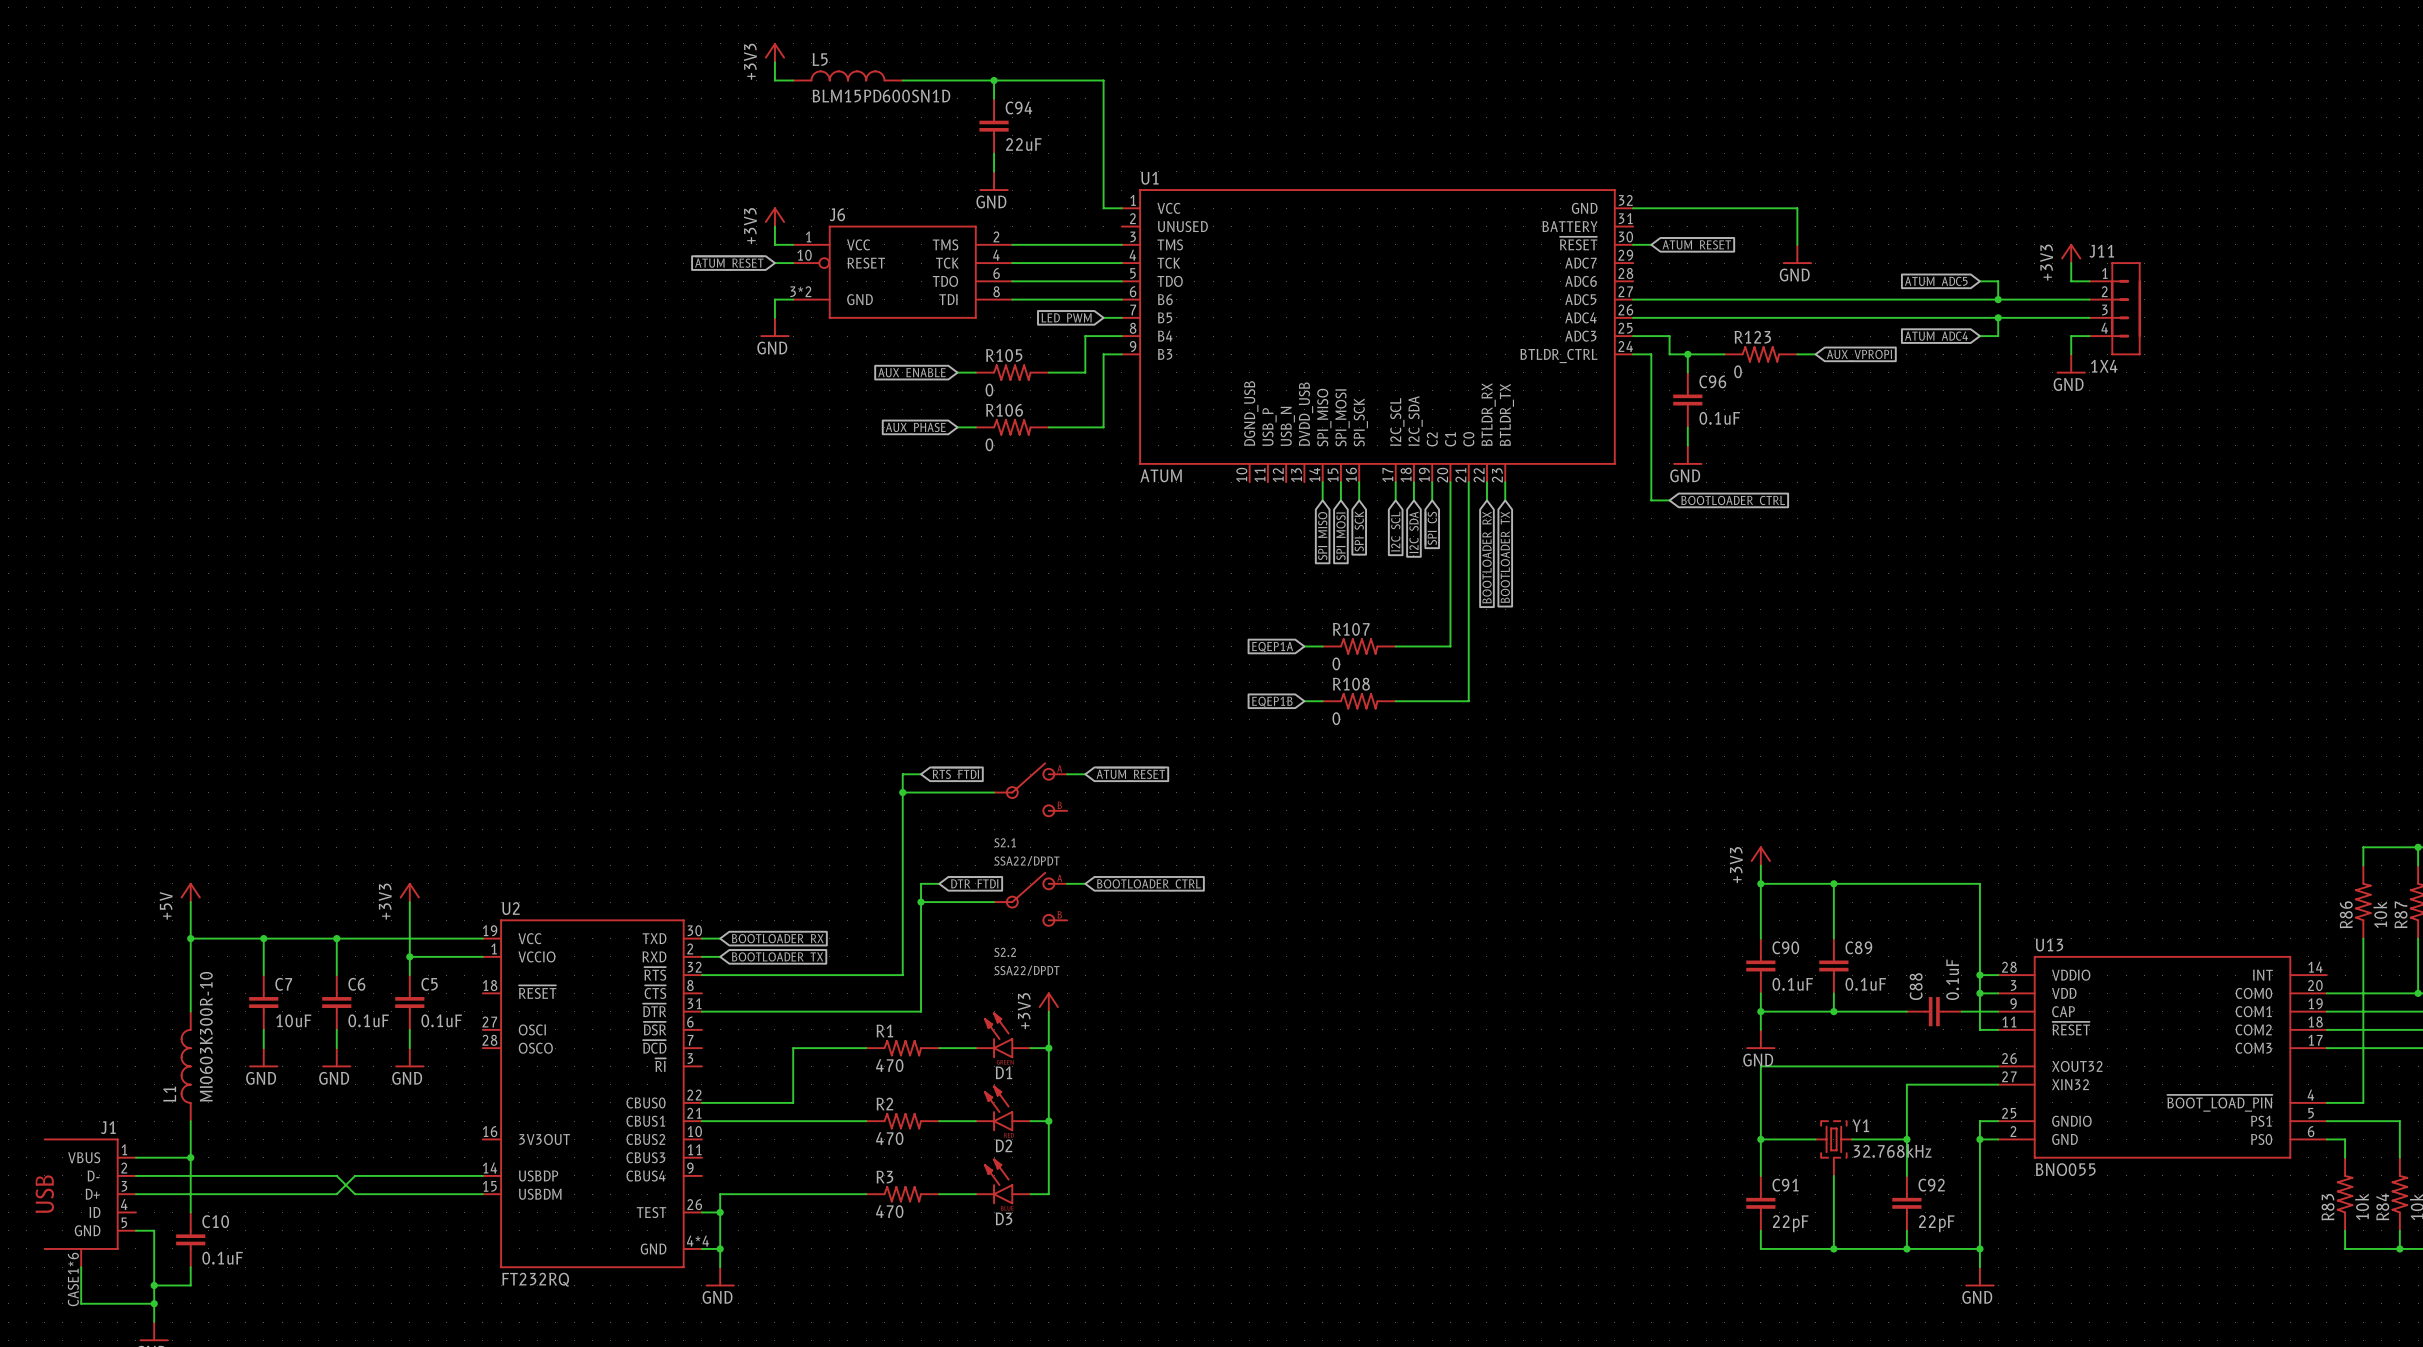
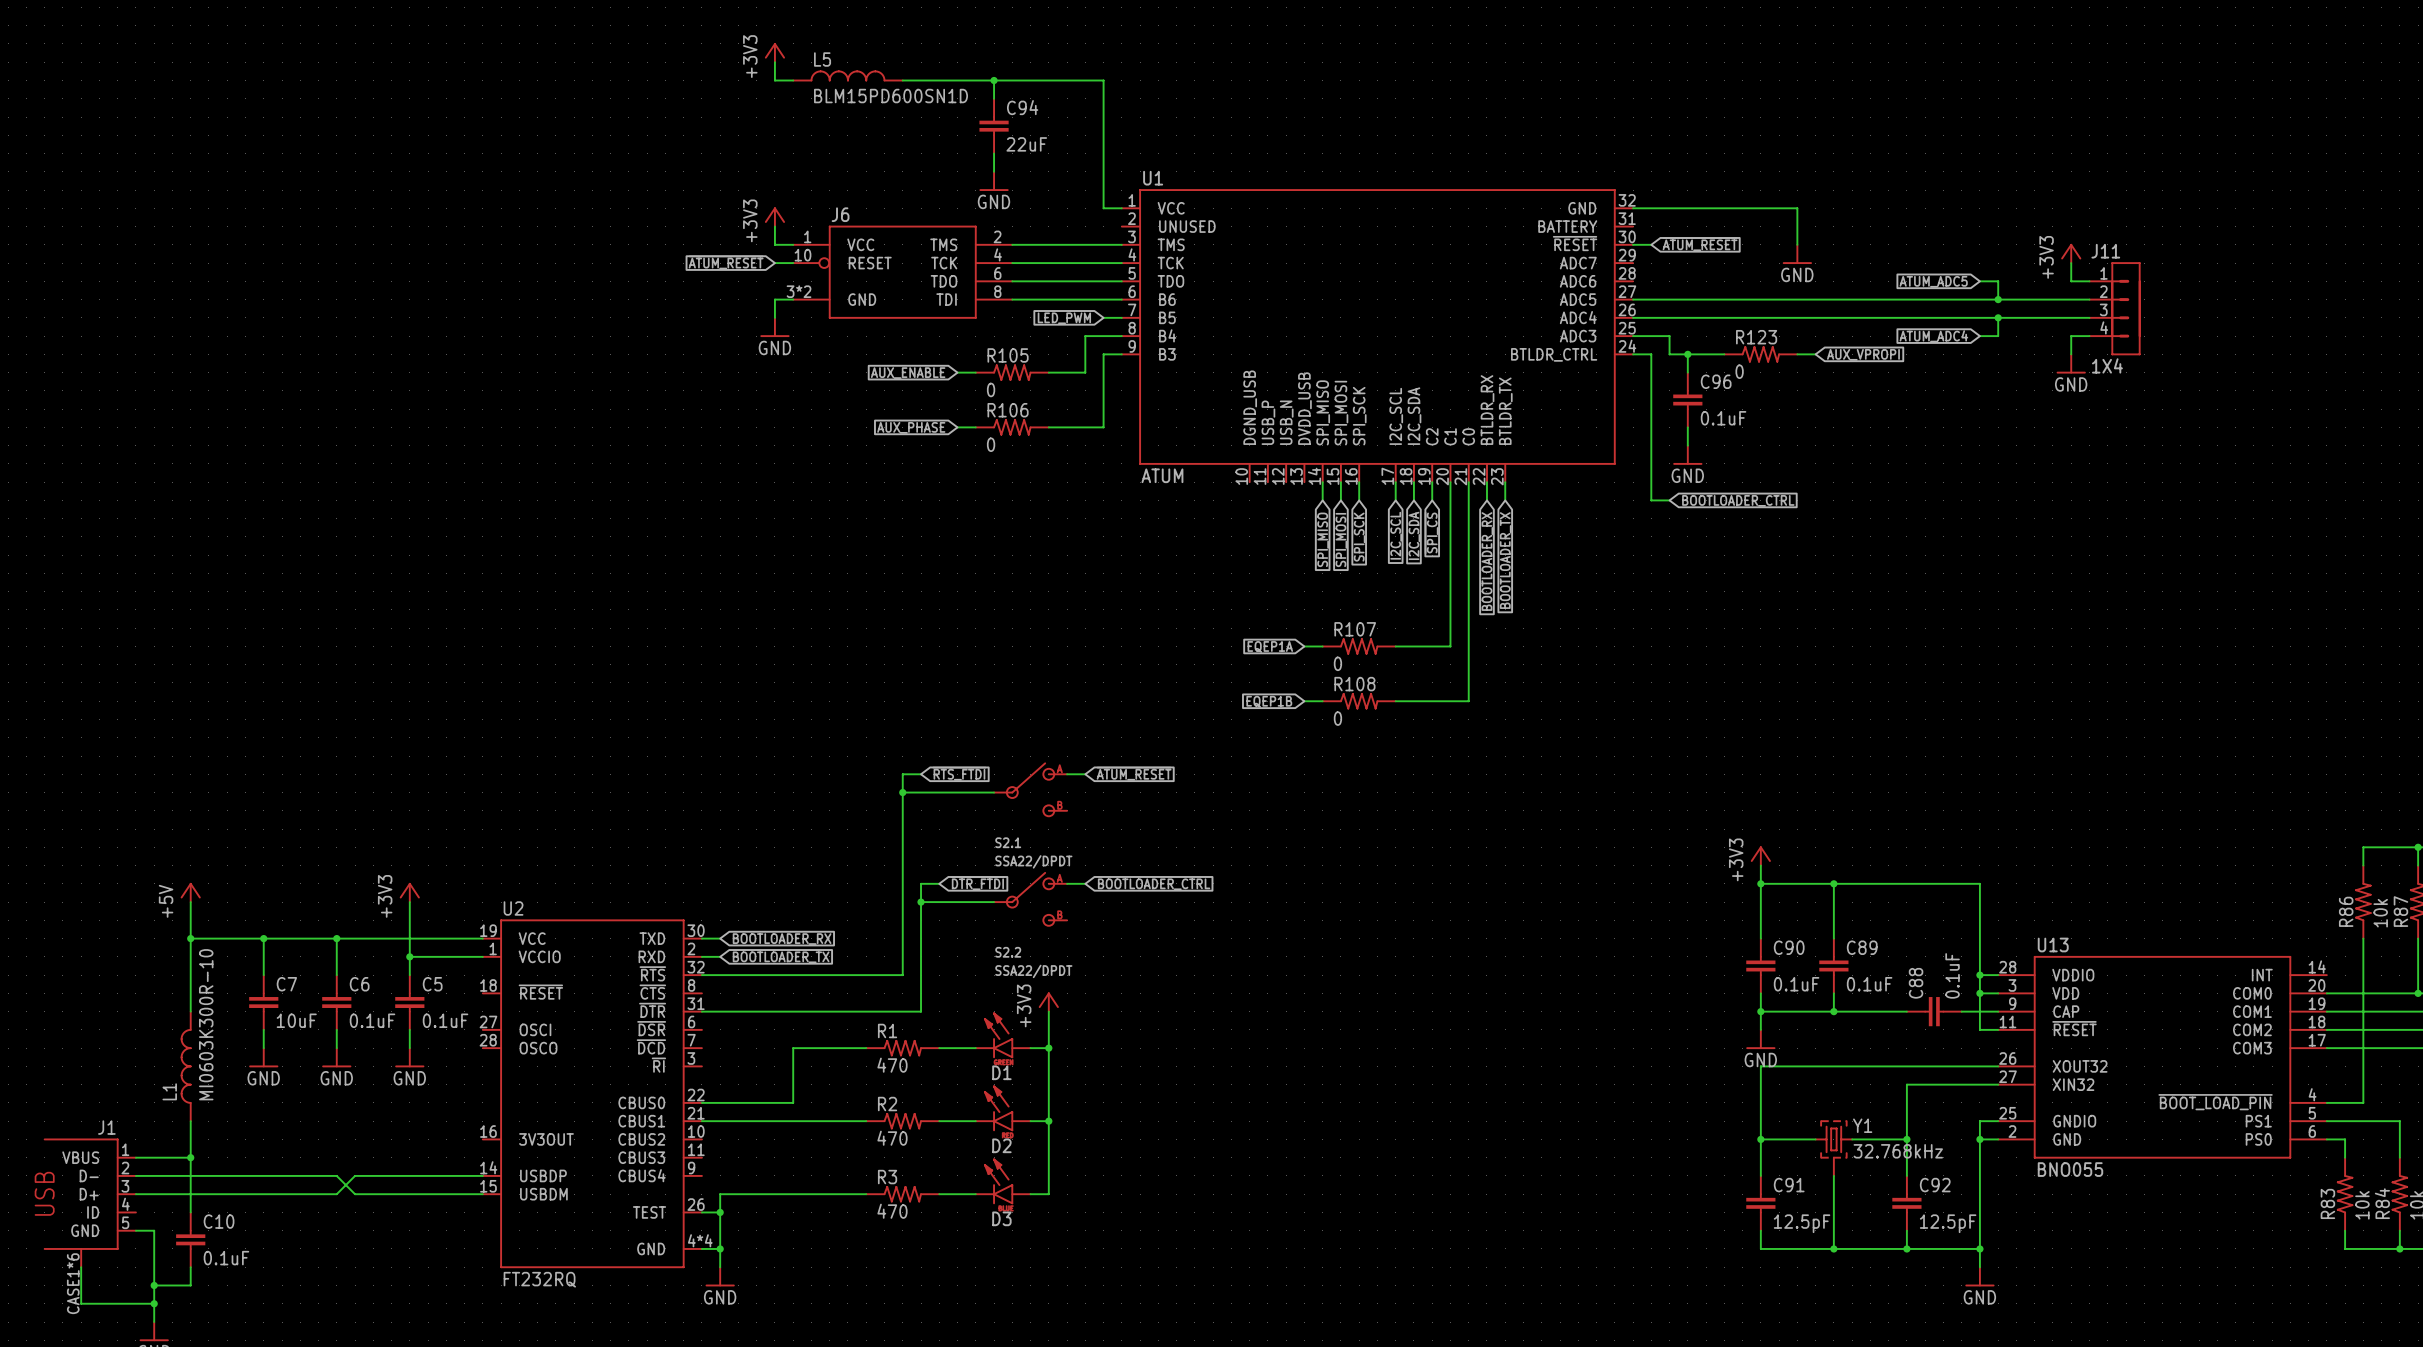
C91 value: 22pF (1790, 1223) -> 12.5pF (1802, 1223)
C92 value: 22pF (1936, 1223) -> 12.5pF (1948, 1223)

